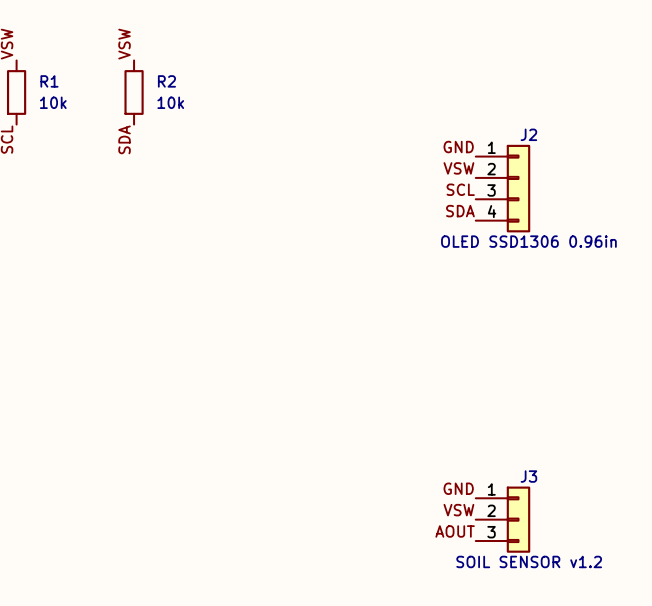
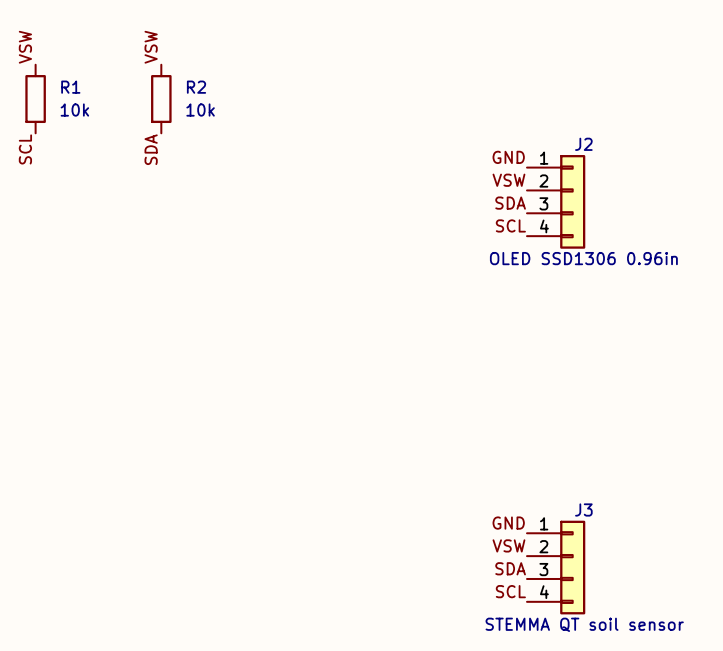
label: SCL (460, 189) -> SDA (510, 203)
label: SDA (460, 211) -> SCL (510, 225)
J3 symbol: [475, 486, 531, 553] -> [527, 520, 586, 615]
label: AOUT (455, 531) -> SDA (510, 568)
label: none -> SCL (510, 591)
J3 value: SOIL SENSOR v1.2 (529, 561) -> STEMMA QT soil sensor (584, 624)

